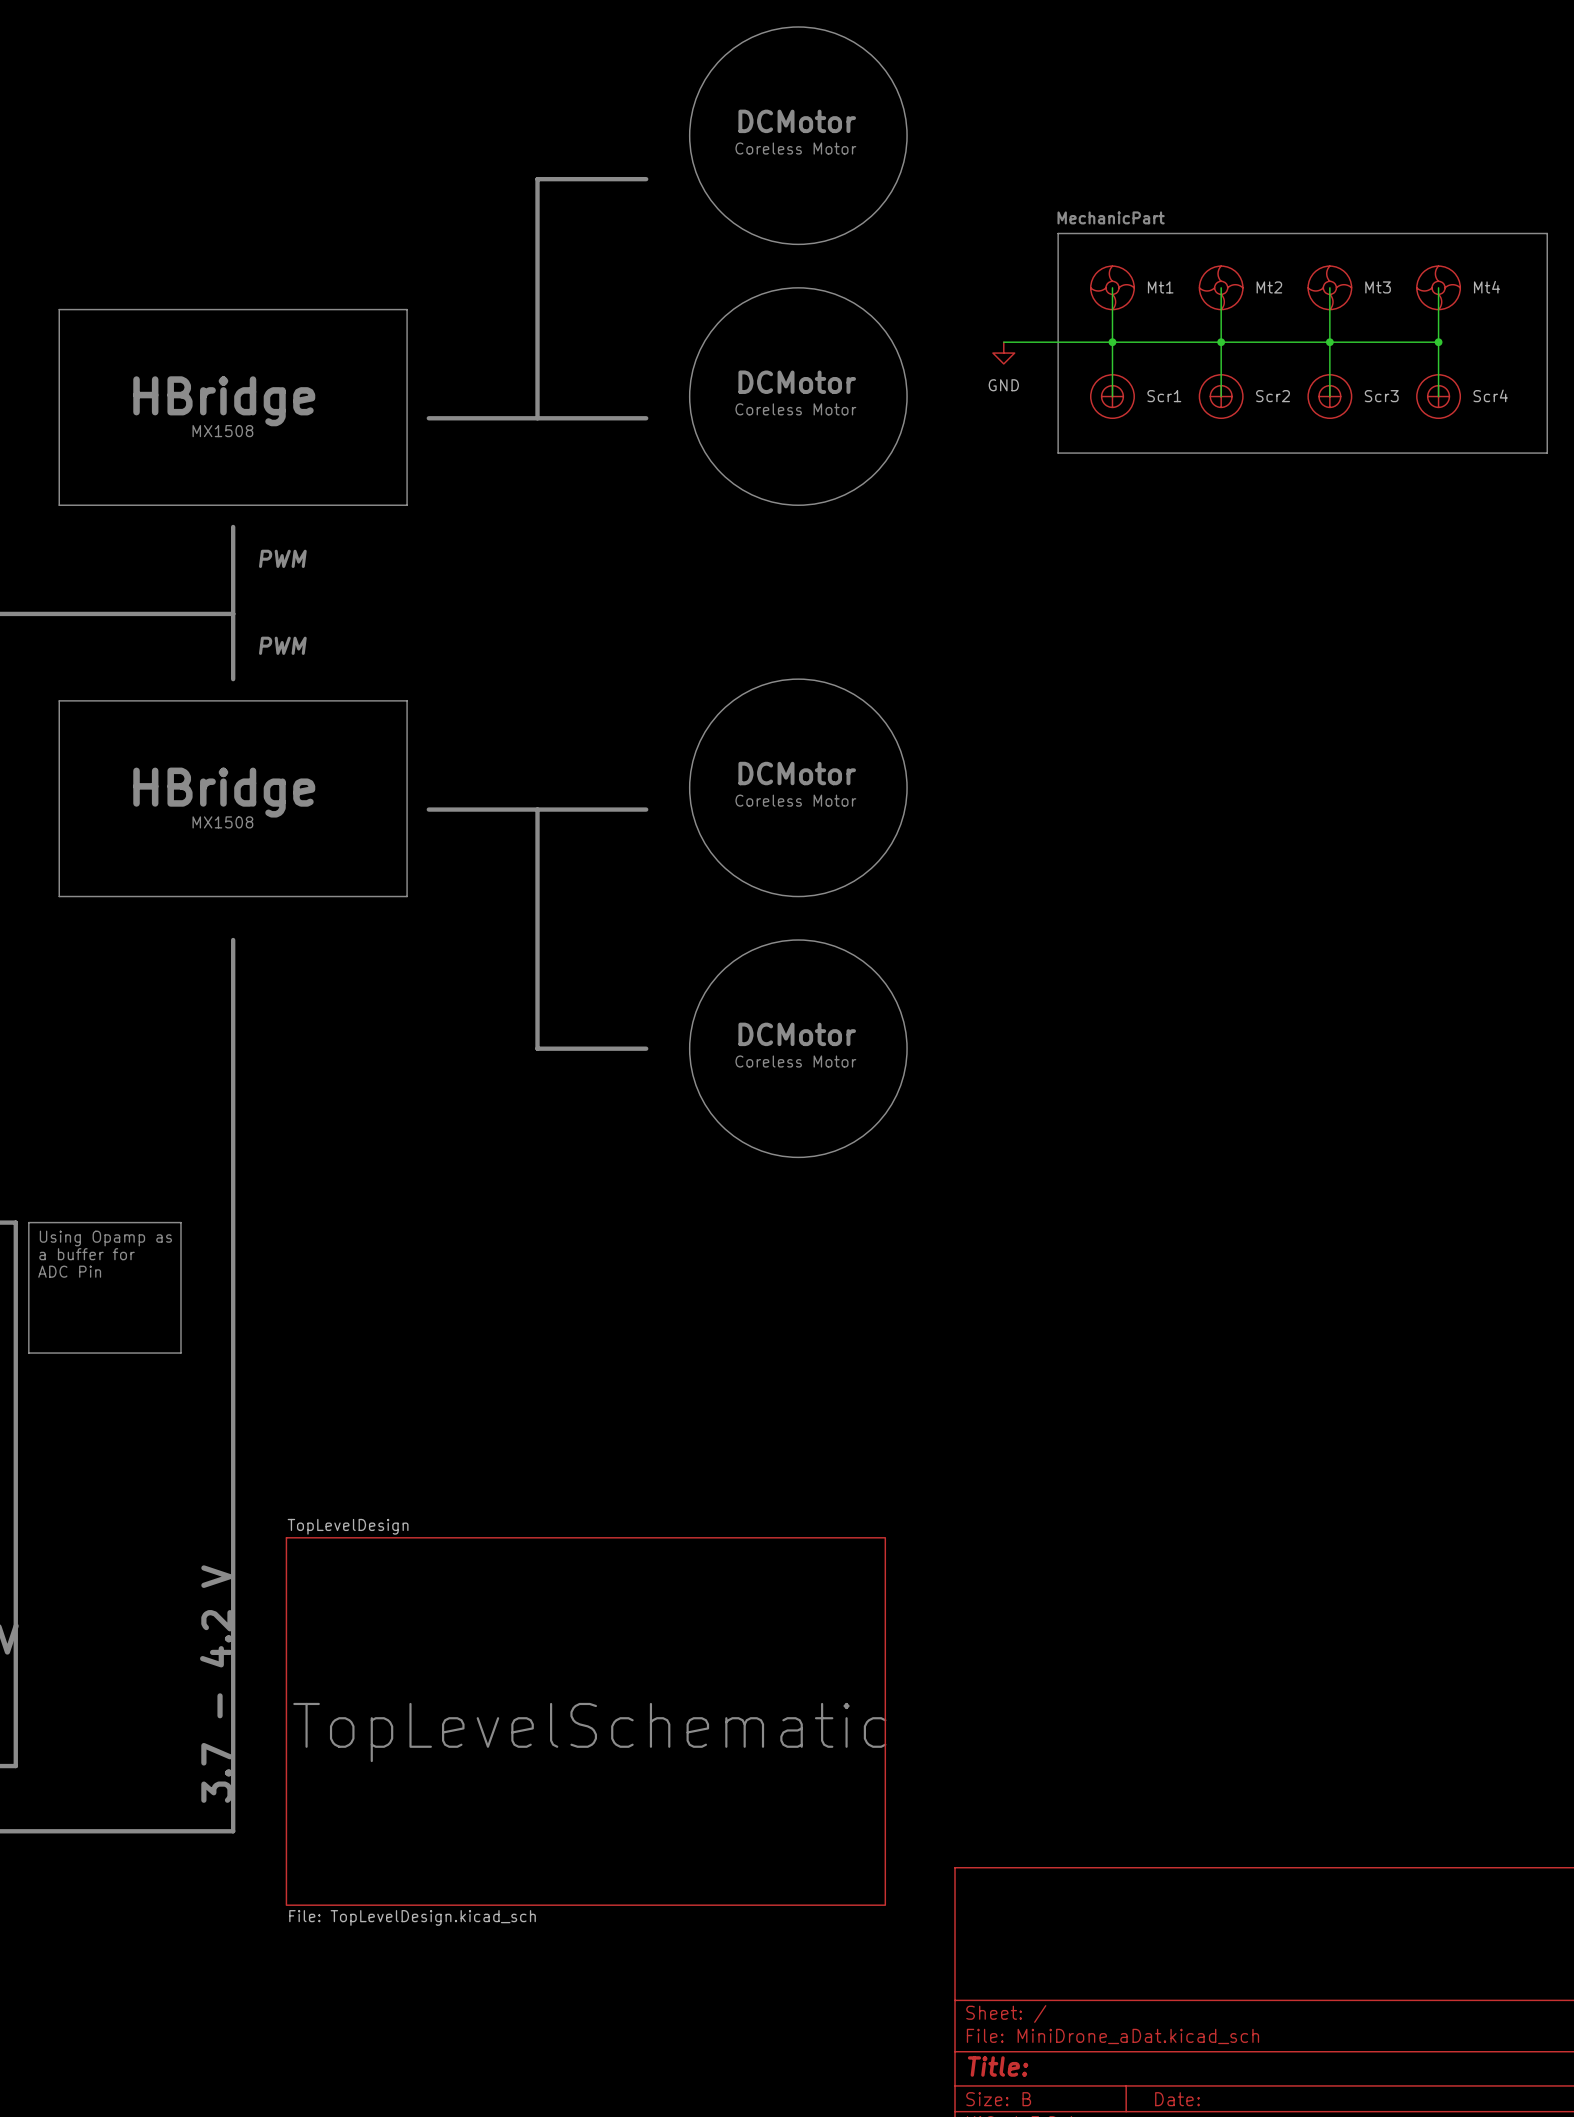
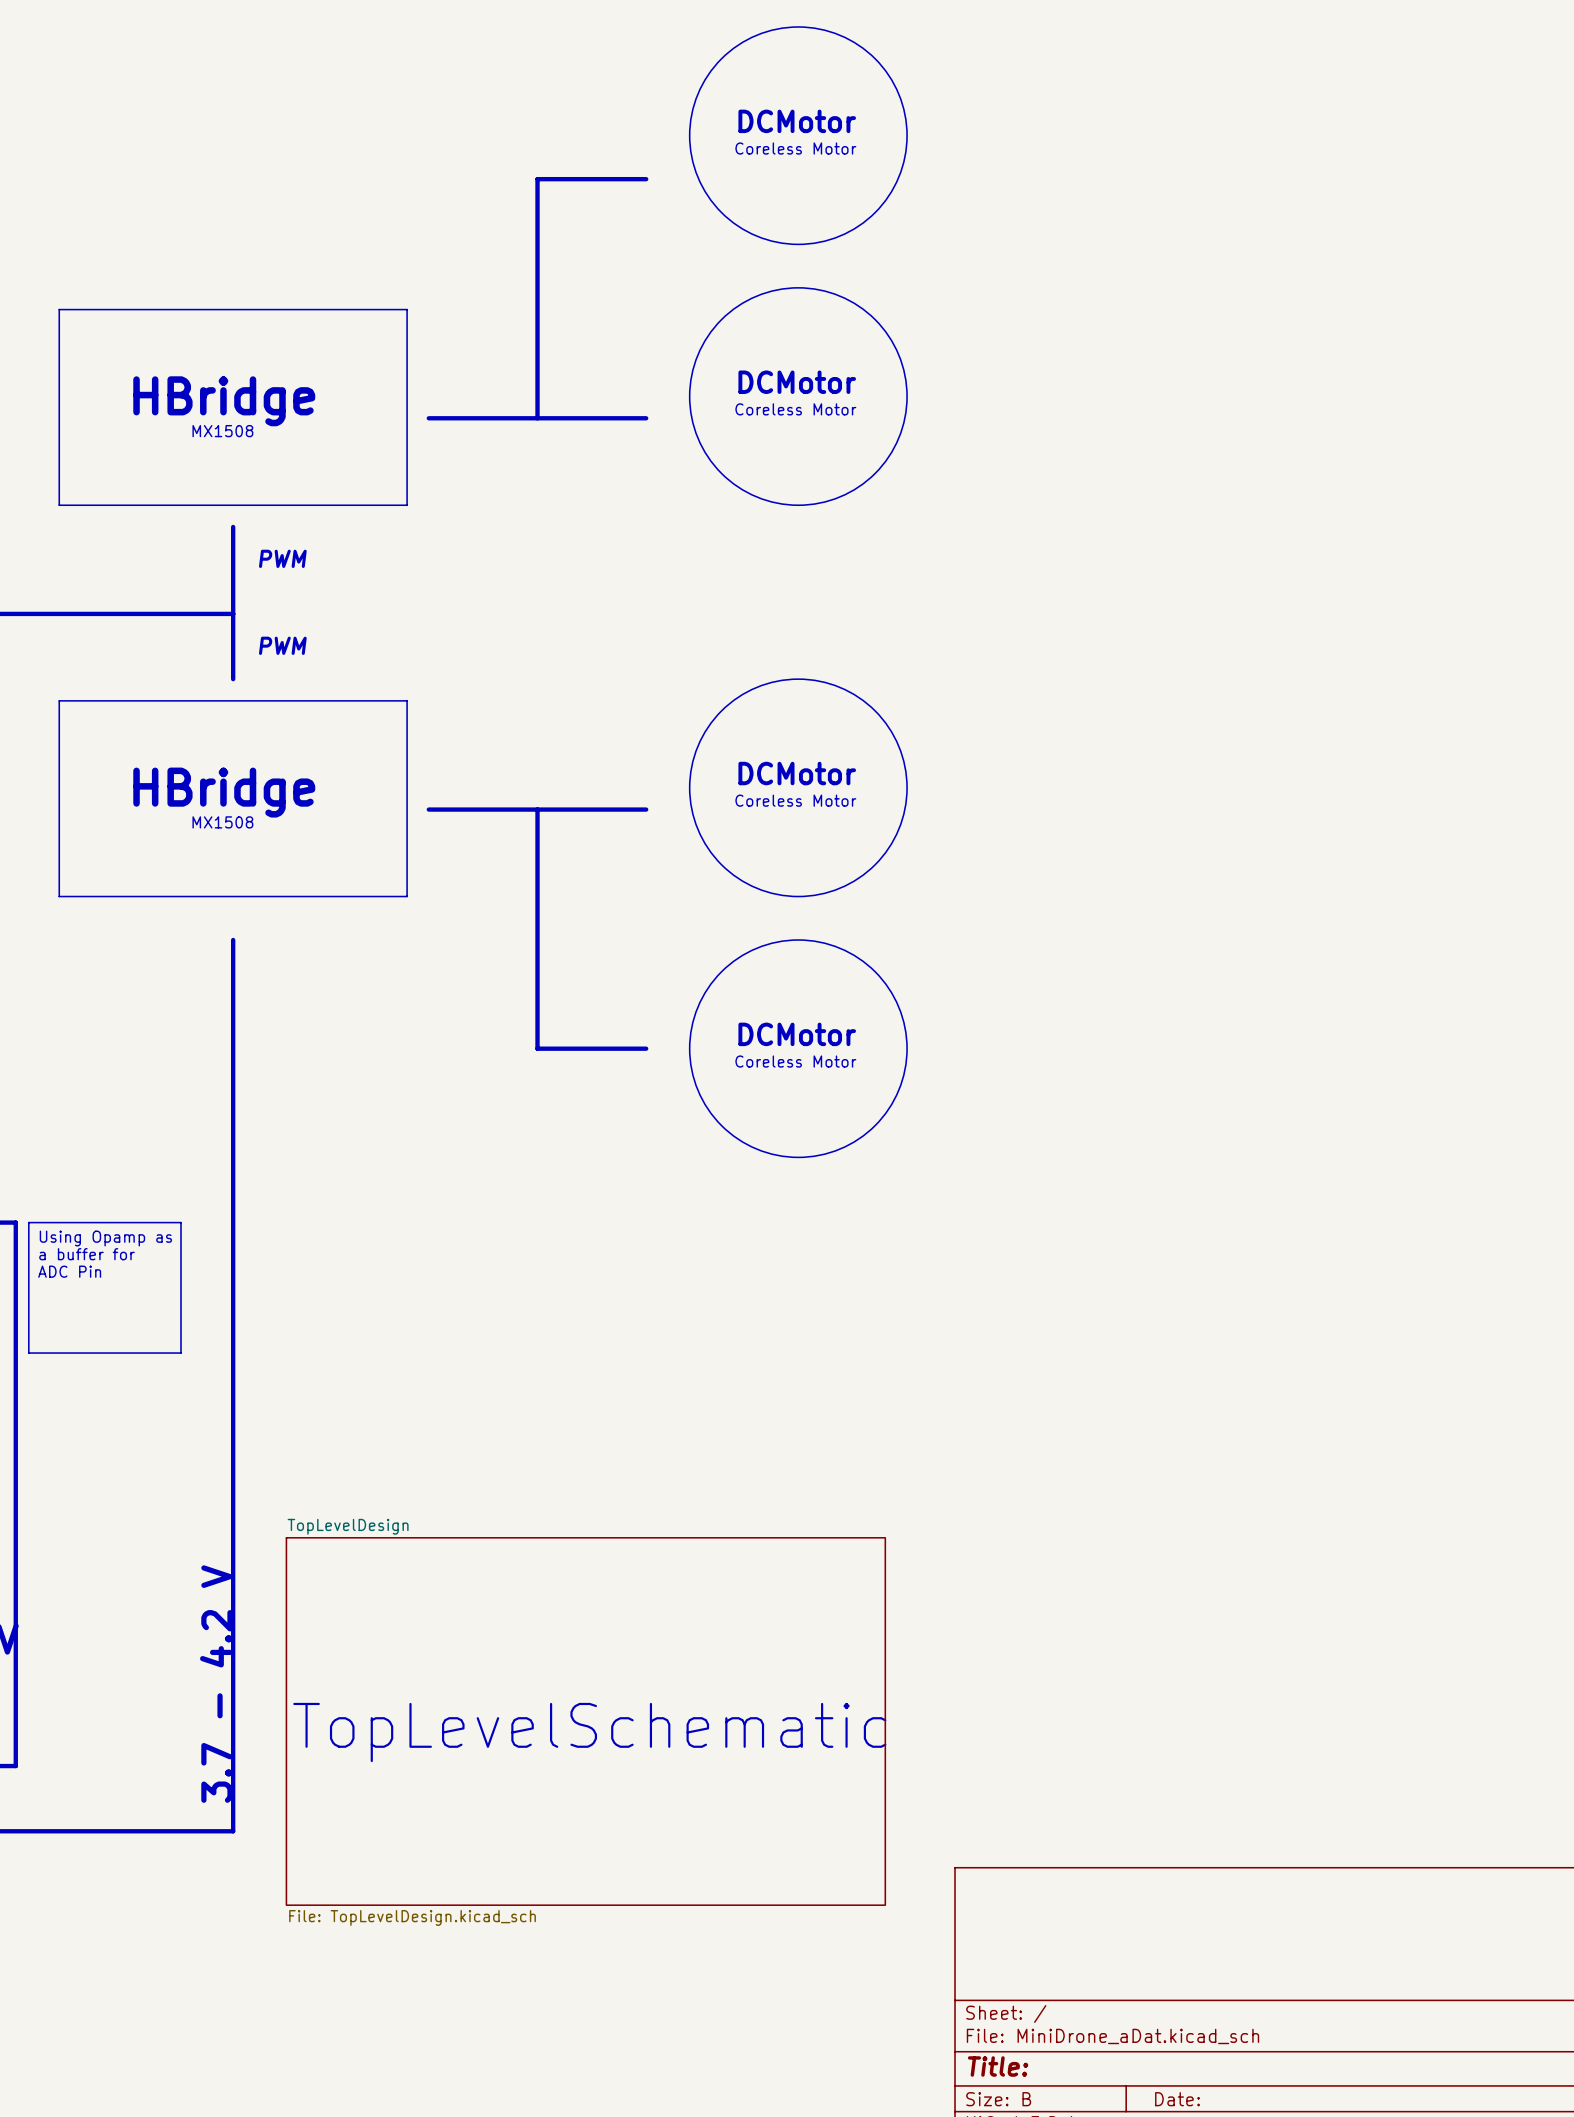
text: MechanicPart (1111, 217) -> none
line: (1058, 233) (1547, 233) (1547, 453) (1058, 453) (1058, 233) -> none
wire: (1112, 287) (1112, 396) -> none
Mt1: (1112, 287) -> none
wire: (1221, 287) (1221, 396) -> none
Mt2: (1221, 287) -> none
wire: (1329, 287) (1329, 396) -> none
Mt3: (1329, 287) -> none
wire: (1438, 287) (1438, 396) -> none
Mt4: (1438, 287) -> none
wire: (1003, 342) (1438, 342) -> none
junction: (1112, 342) -> none
junction: (1221, 342) -> none
junction: (1329, 342) -> none
junction: (1438, 342) -> none
power symbol: GND (1003, 353) -> none
Scr1: (1112, 396) -> none
Scr2: (1221, 396) -> none
Scr3: (1329, 396) -> none
Scr4: (1438, 396) -> none

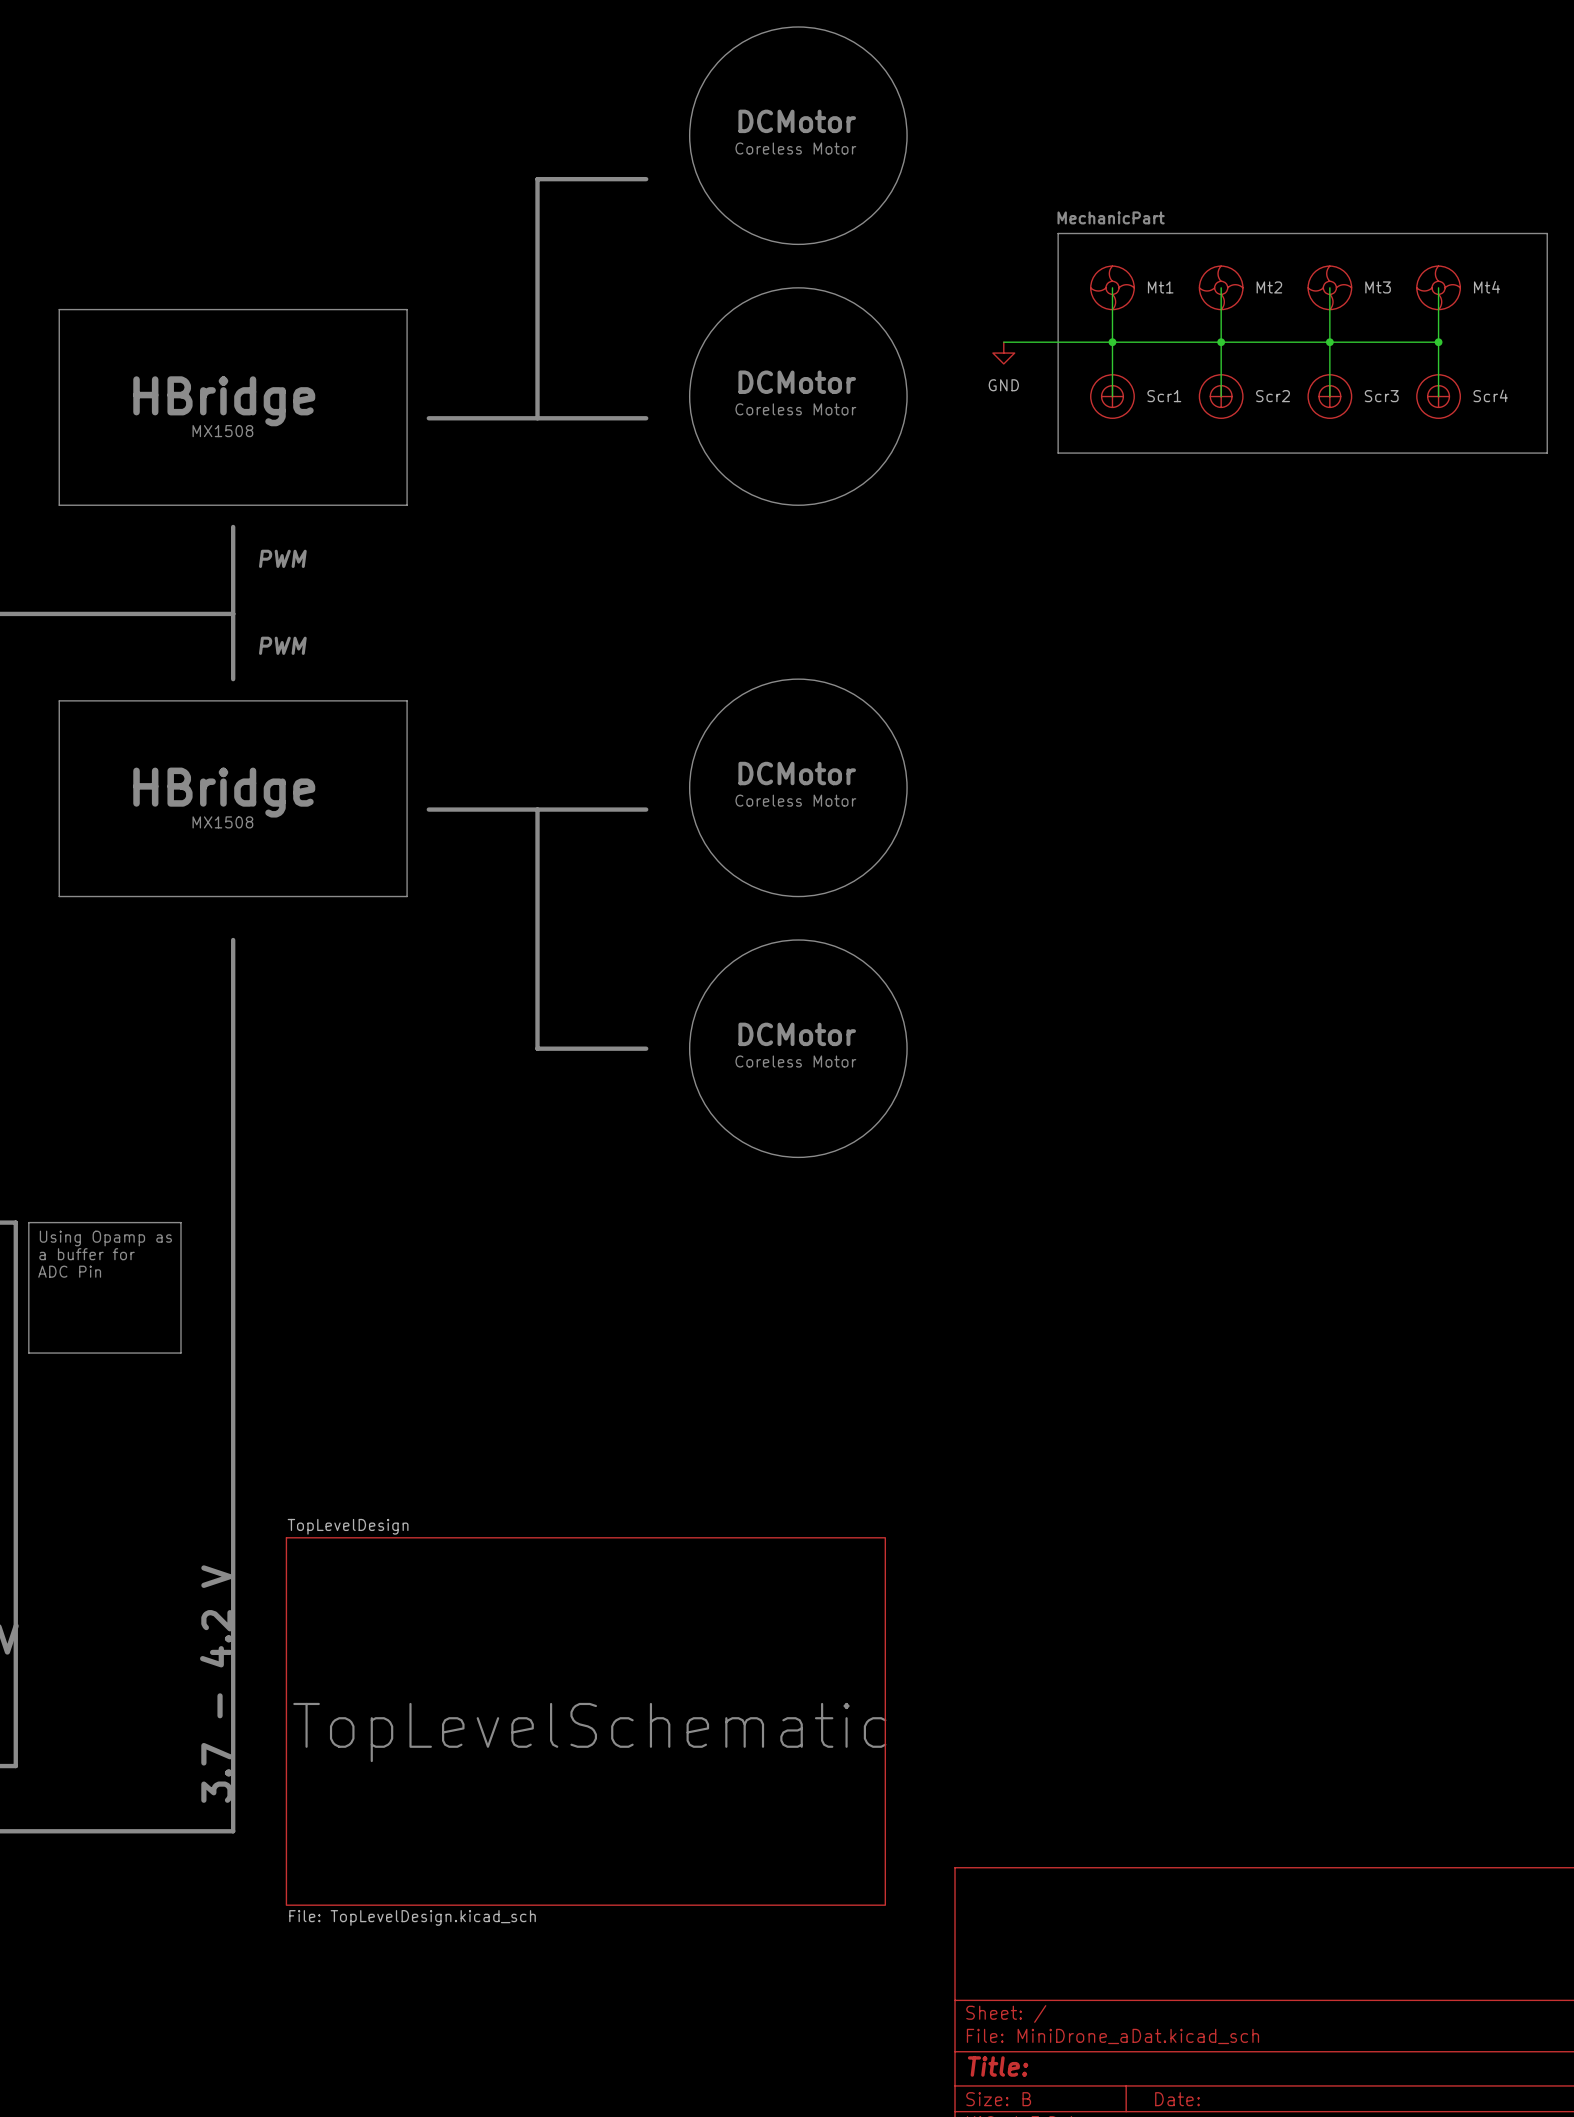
text: none -> MechanicPart (1111, 217)
line: none -> (1058, 233) (1547, 233) (1547, 453) (1058, 453) (1058, 233)
wire: none -> (1112, 287) (1112, 396)
Mt1: none -> (1112, 287)
wire: none -> (1221, 287) (1221, 396)
Mt2: none -> (1221, 287)
wire: none -> (1329, 287) (1329, 396)
Mt3: none -> (1329, 287)
wire: none -> (1438, 287) (1438, 396)
Mt4: none -> (1438, 287)
wire: none -> (1003, 342) (1438, 342)
junction: none -> (1112, 342)
junction: none -> (1221, 342)
junction: none -> (1329, 342)
junction: none -> (1438, 342)
power symbol: none -> GND (1003, 353)
Scr1: none -> (1112, 396)
Scr2: none -> (1221, 396)
Scr3: none -> (1329, 396)
Scr4: none -> (1438, 396)

